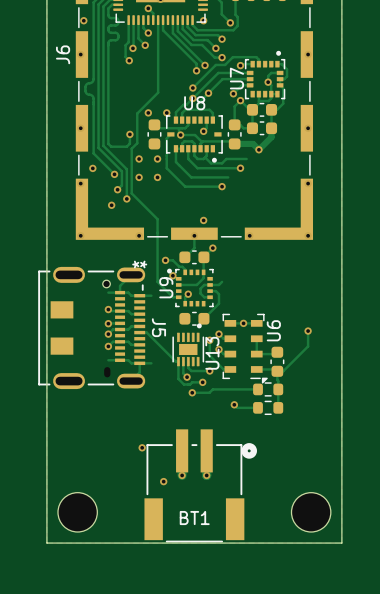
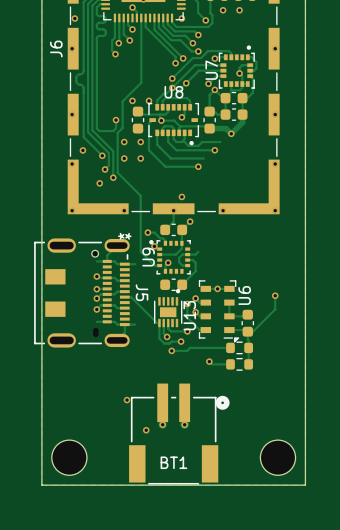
via: none -> (223, 10)
via: none -> (239, 10)

